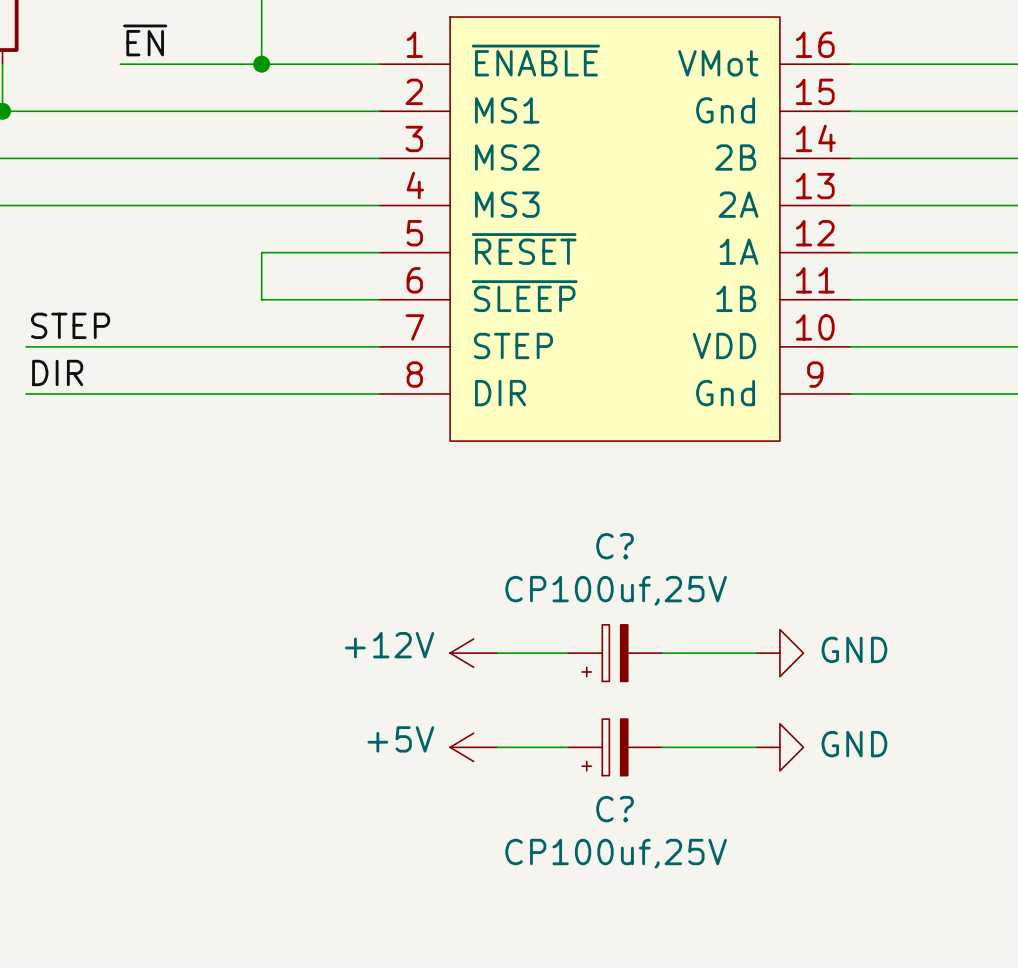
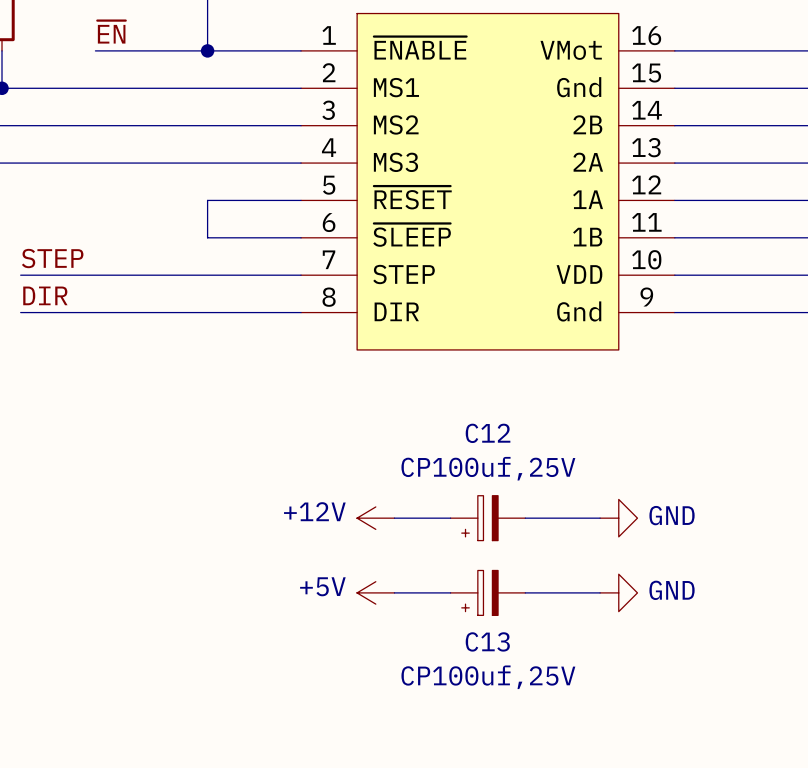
C? name: C? (615, 546) -> C12 (488, 433)
C? name: C? (615, 809) -> C13 (487, 641)

